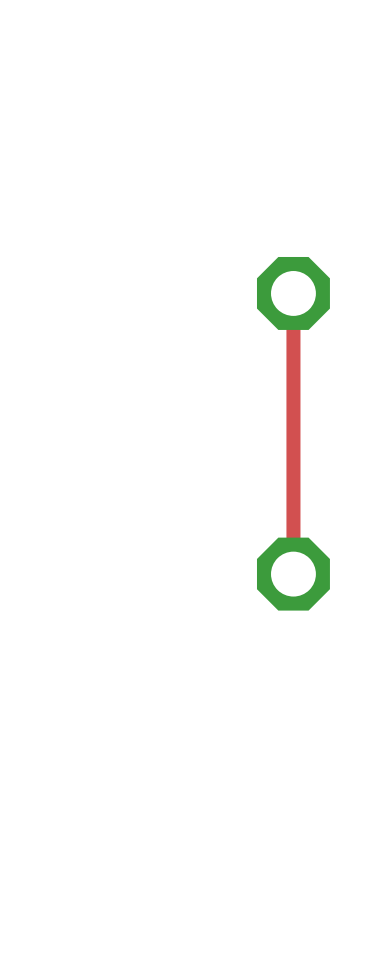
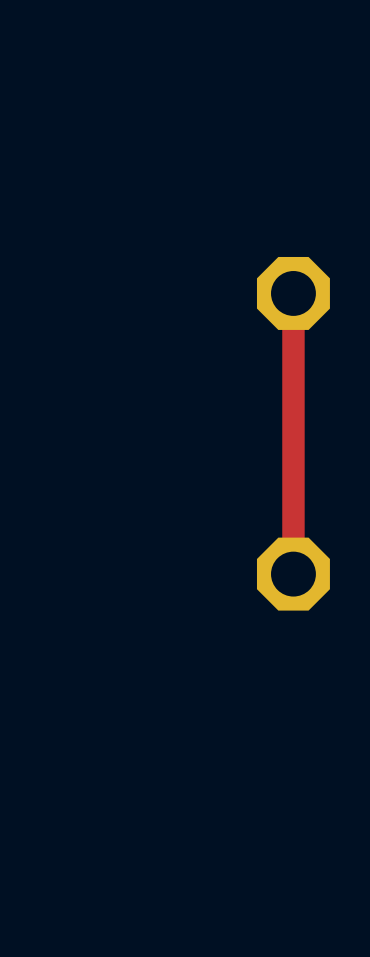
top track width: thin (293, 293) (293, 574) -> thick (293, 293) (293, 574)

